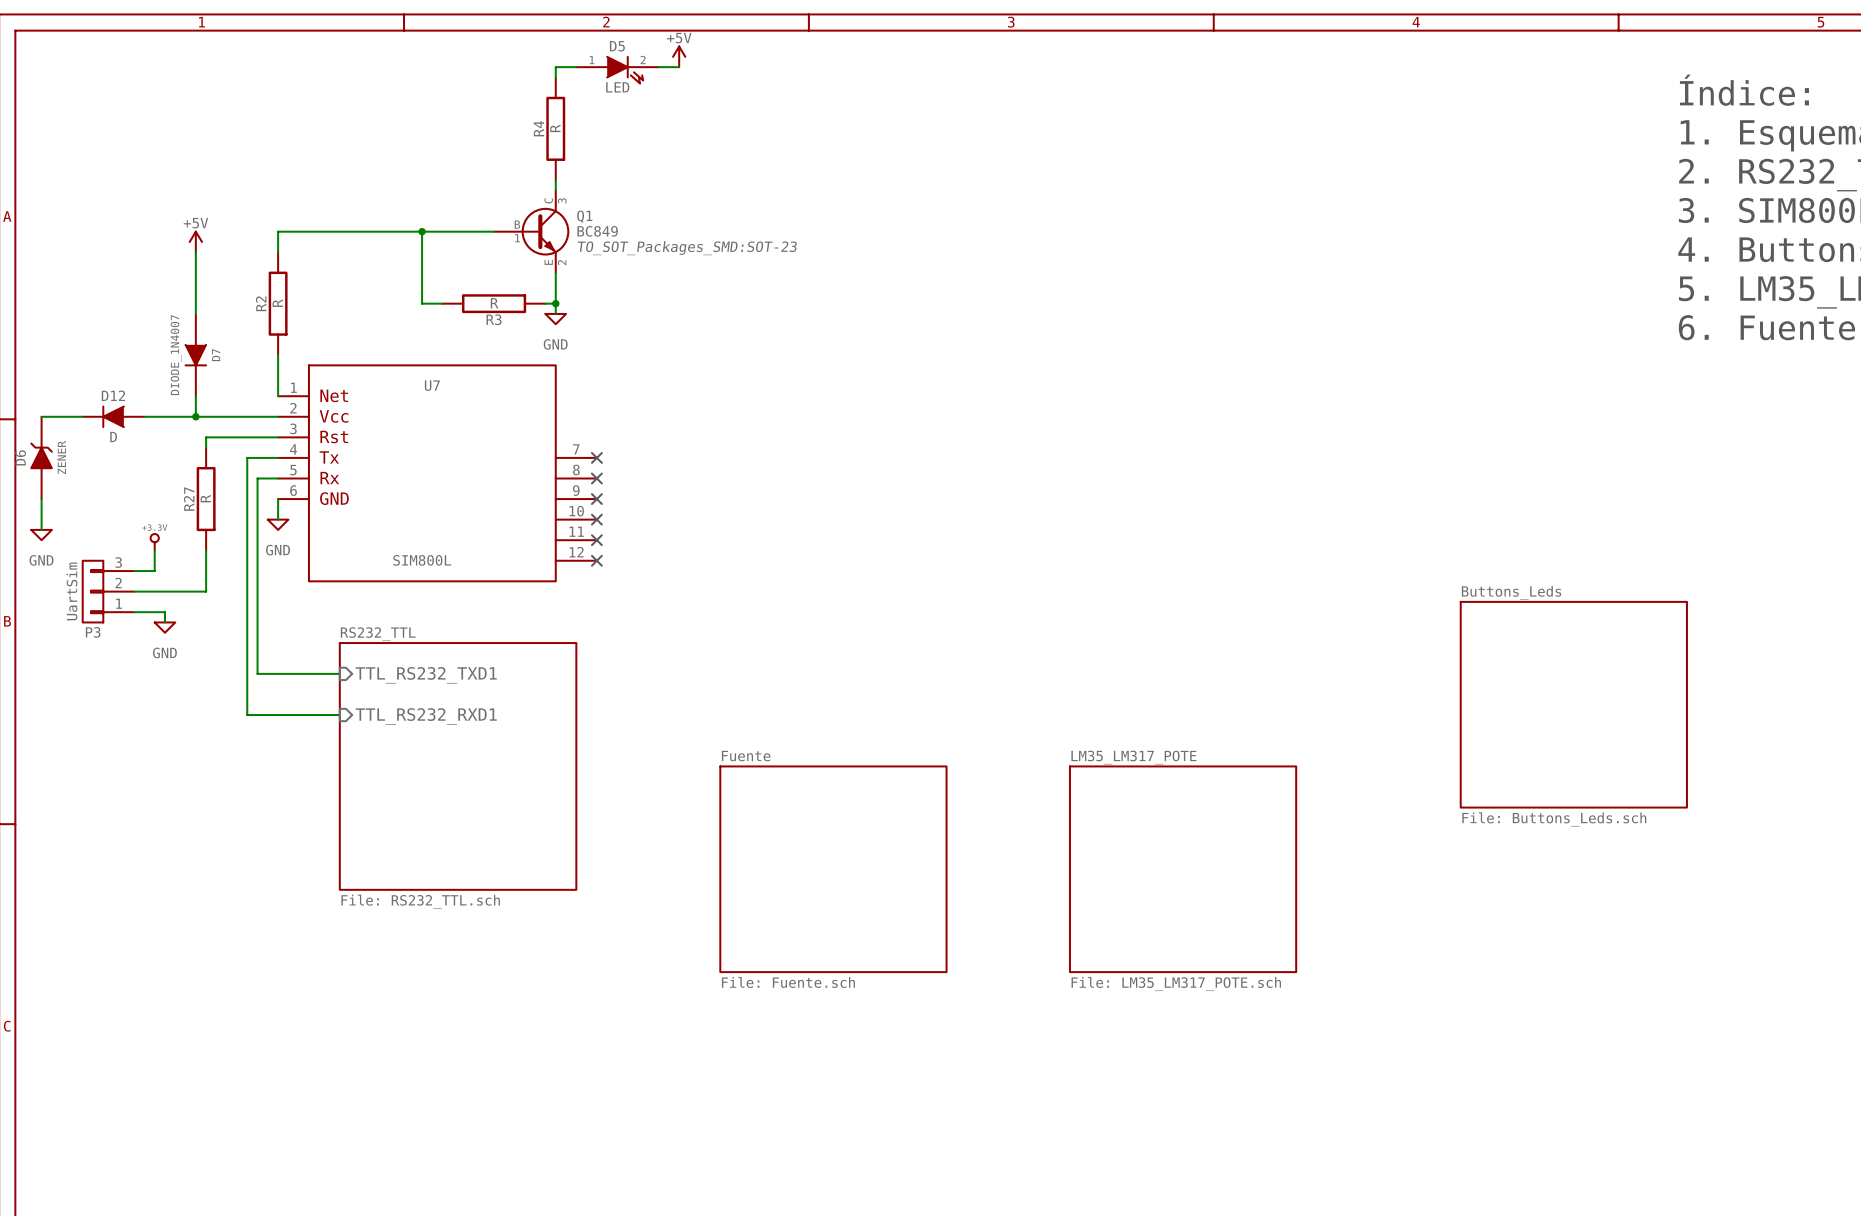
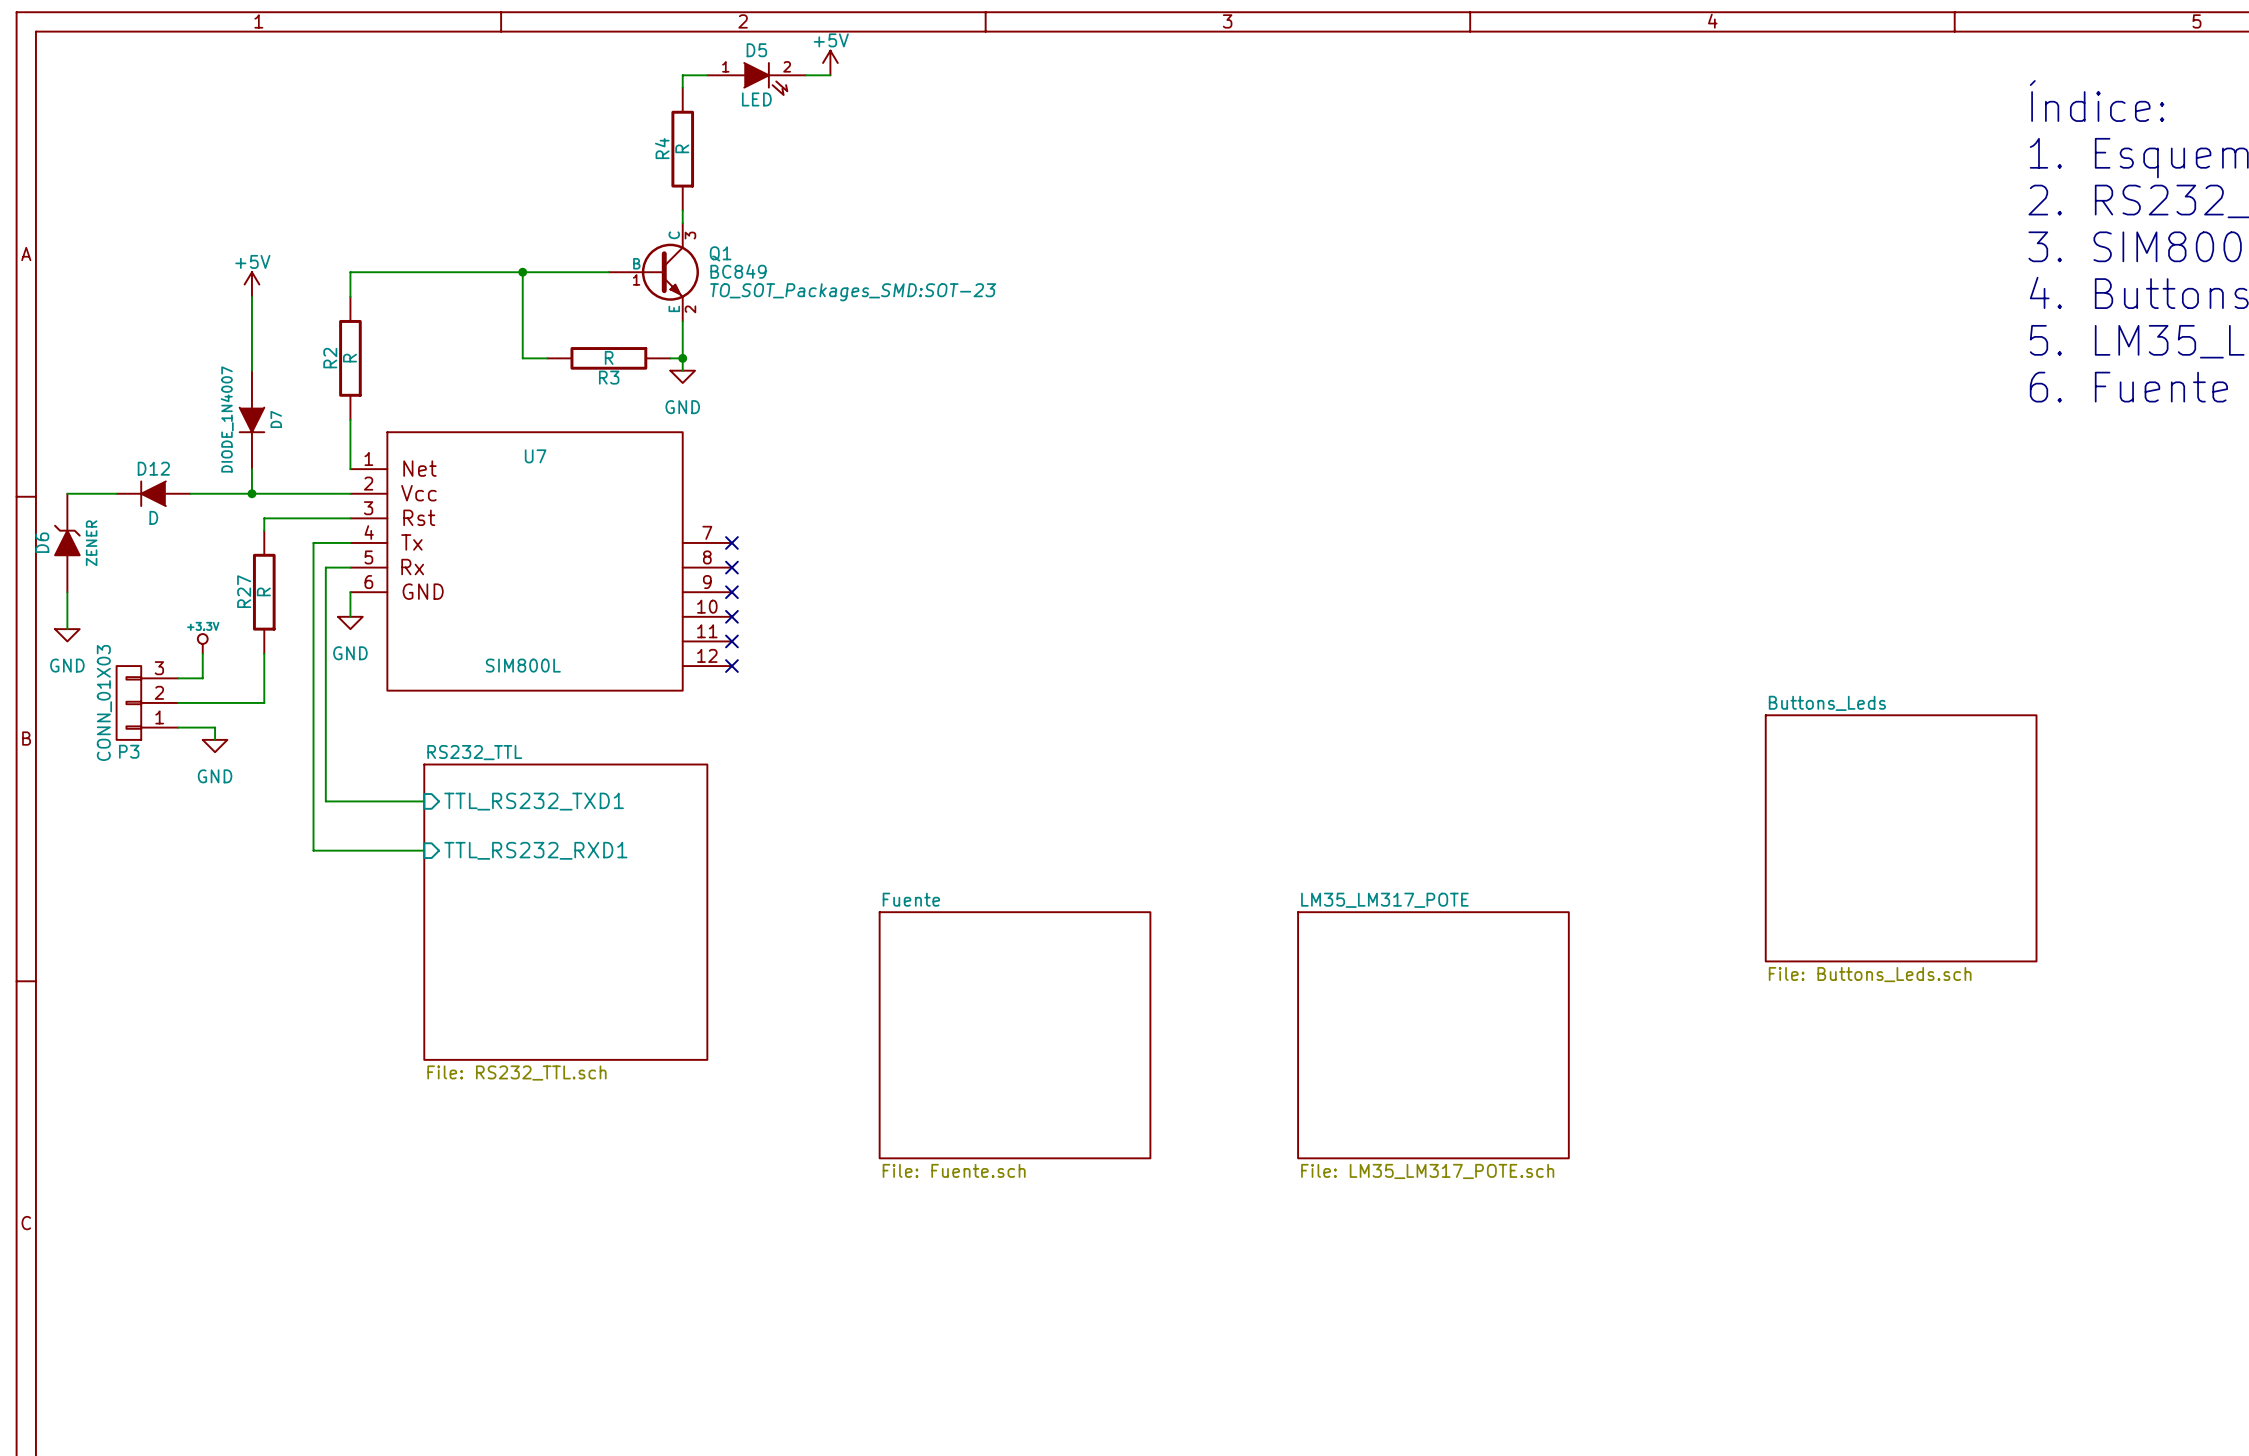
P3 value: UartSim (71, 591) -> CONN_01X03 (104, 702)

